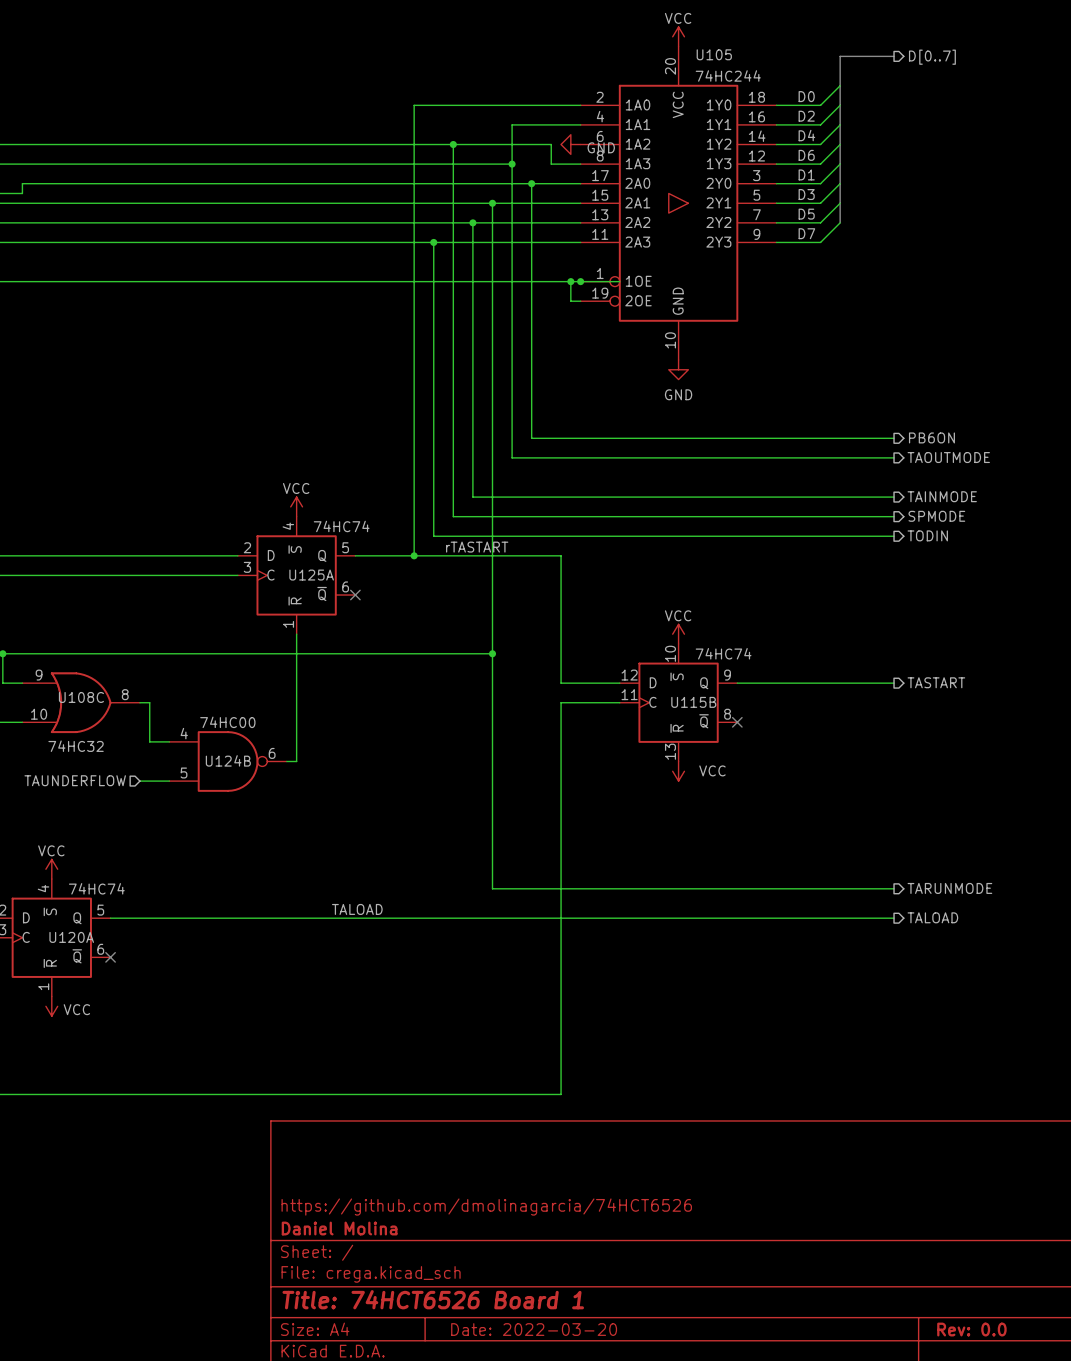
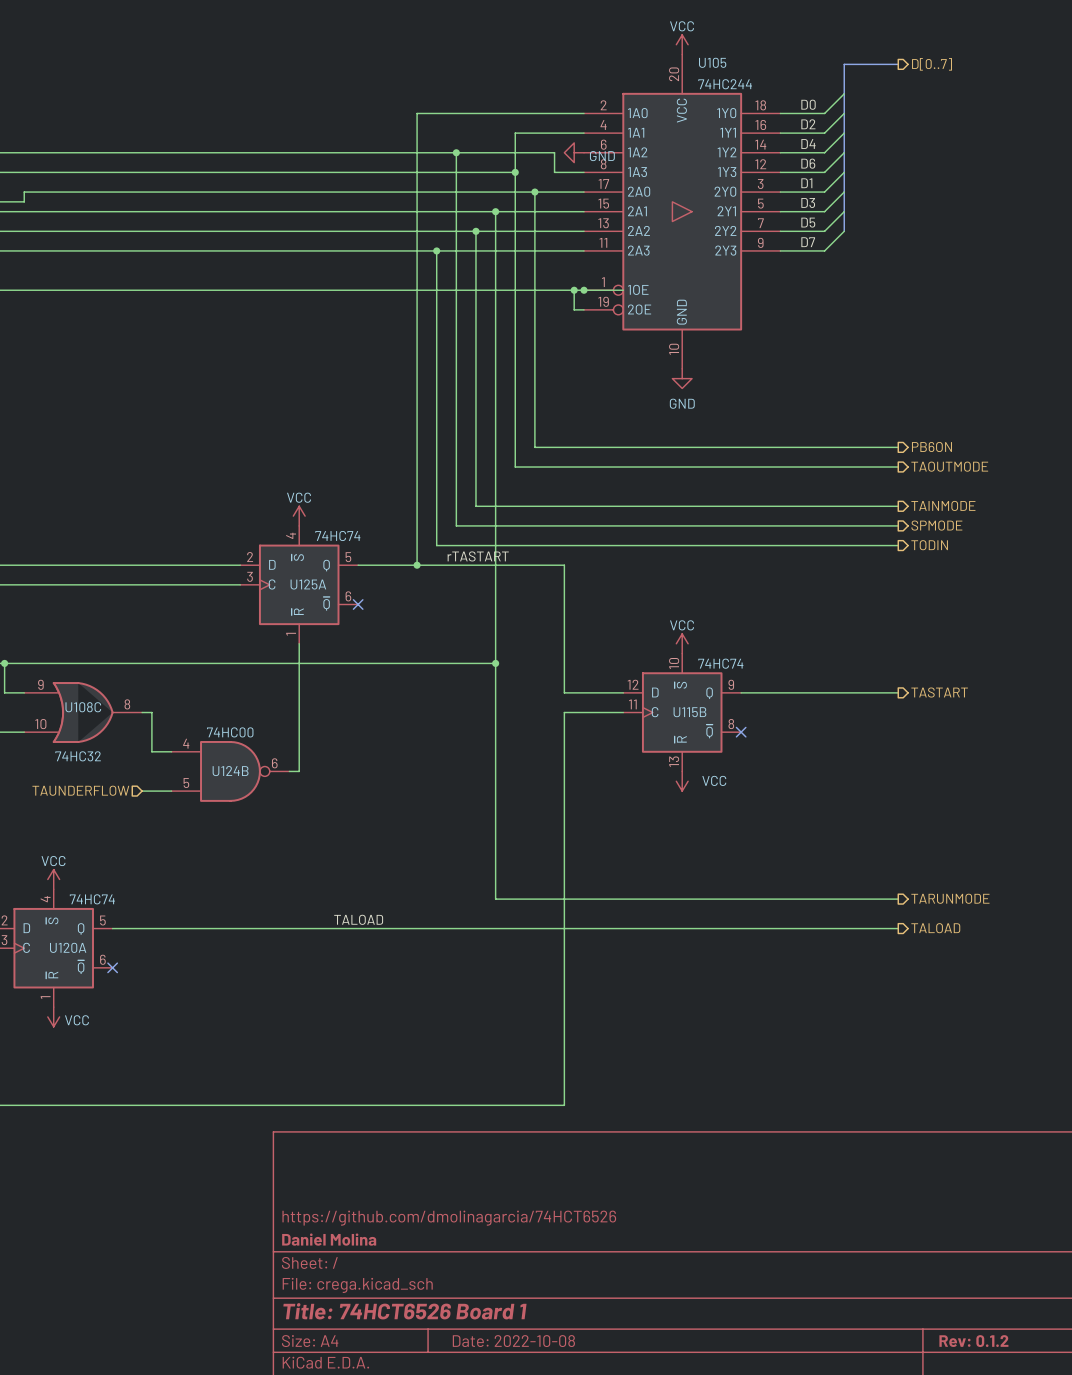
title block: Date: 2022-03-20 (534, 1329) -> Date: 2022-10-08 (513, 1341)
title block: Rev: 0.0 (971, 1329) -> Rev: 0.1.2 (973, 1341)

